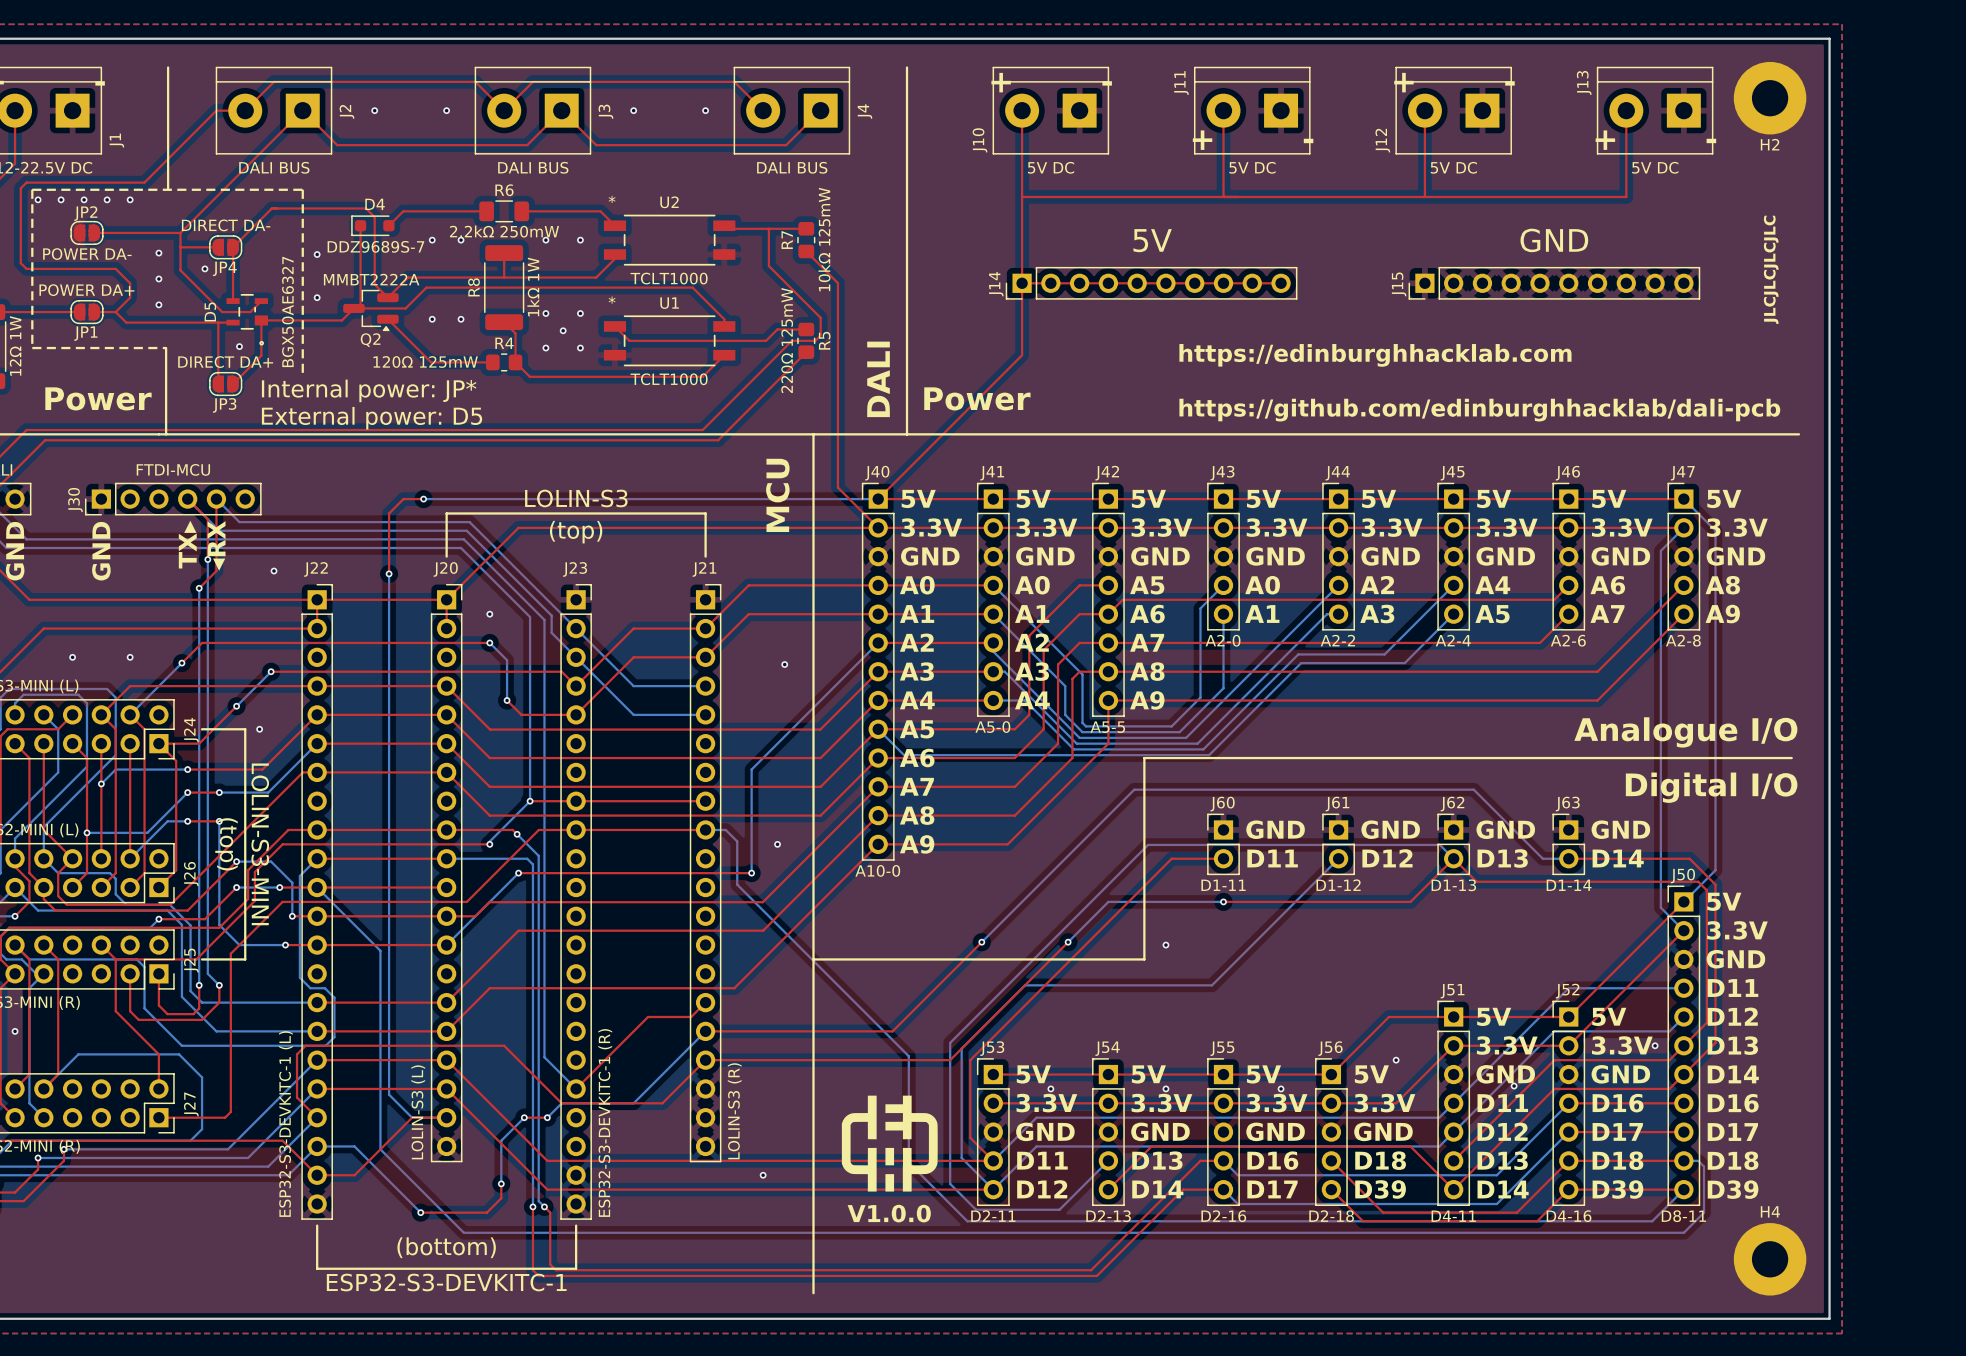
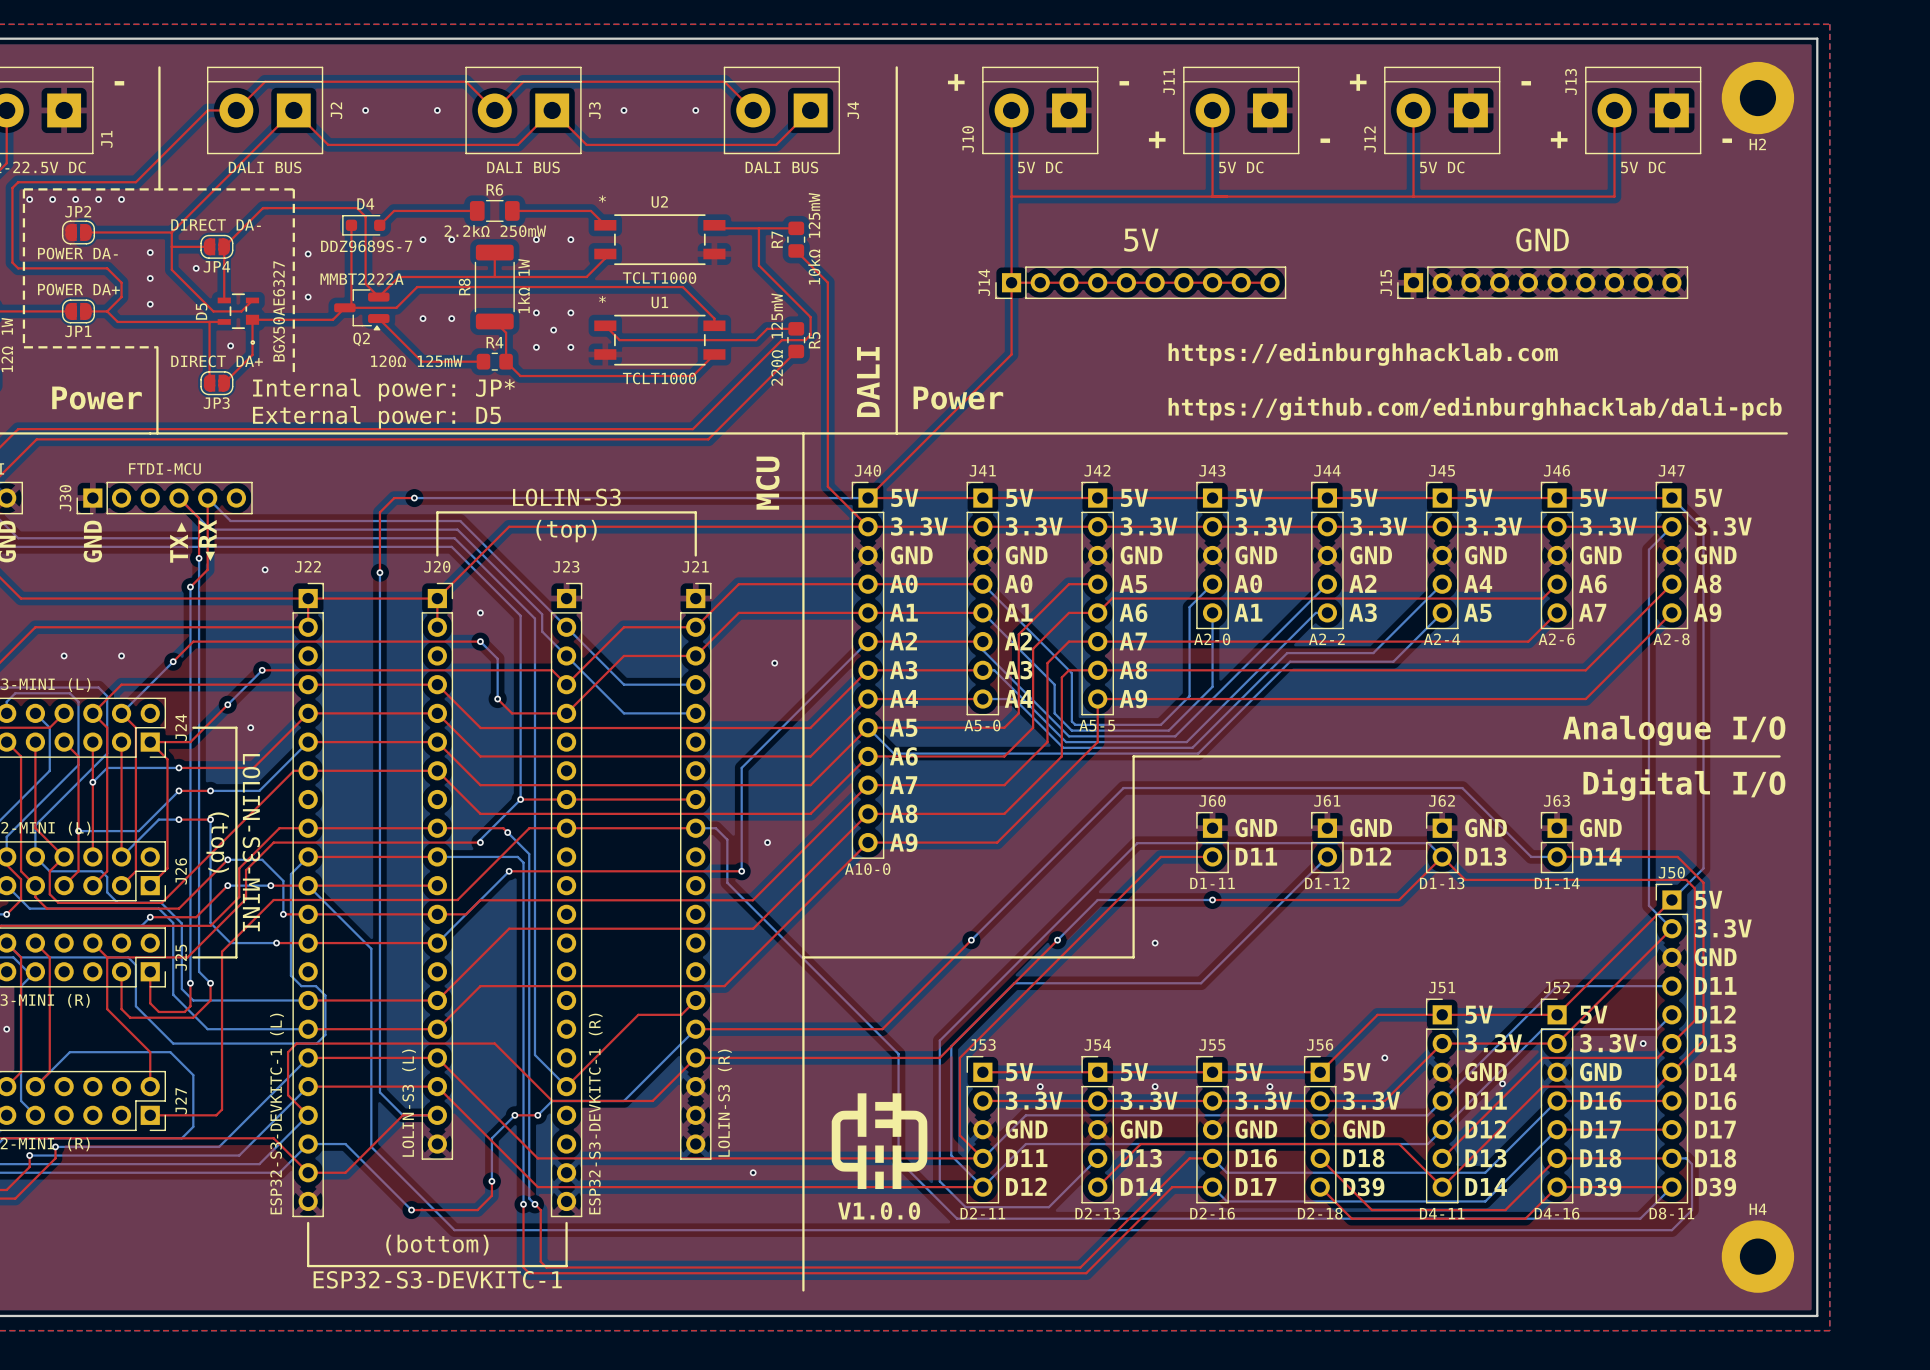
text: JLCJLCJLCJLC (1771, 269) -> none

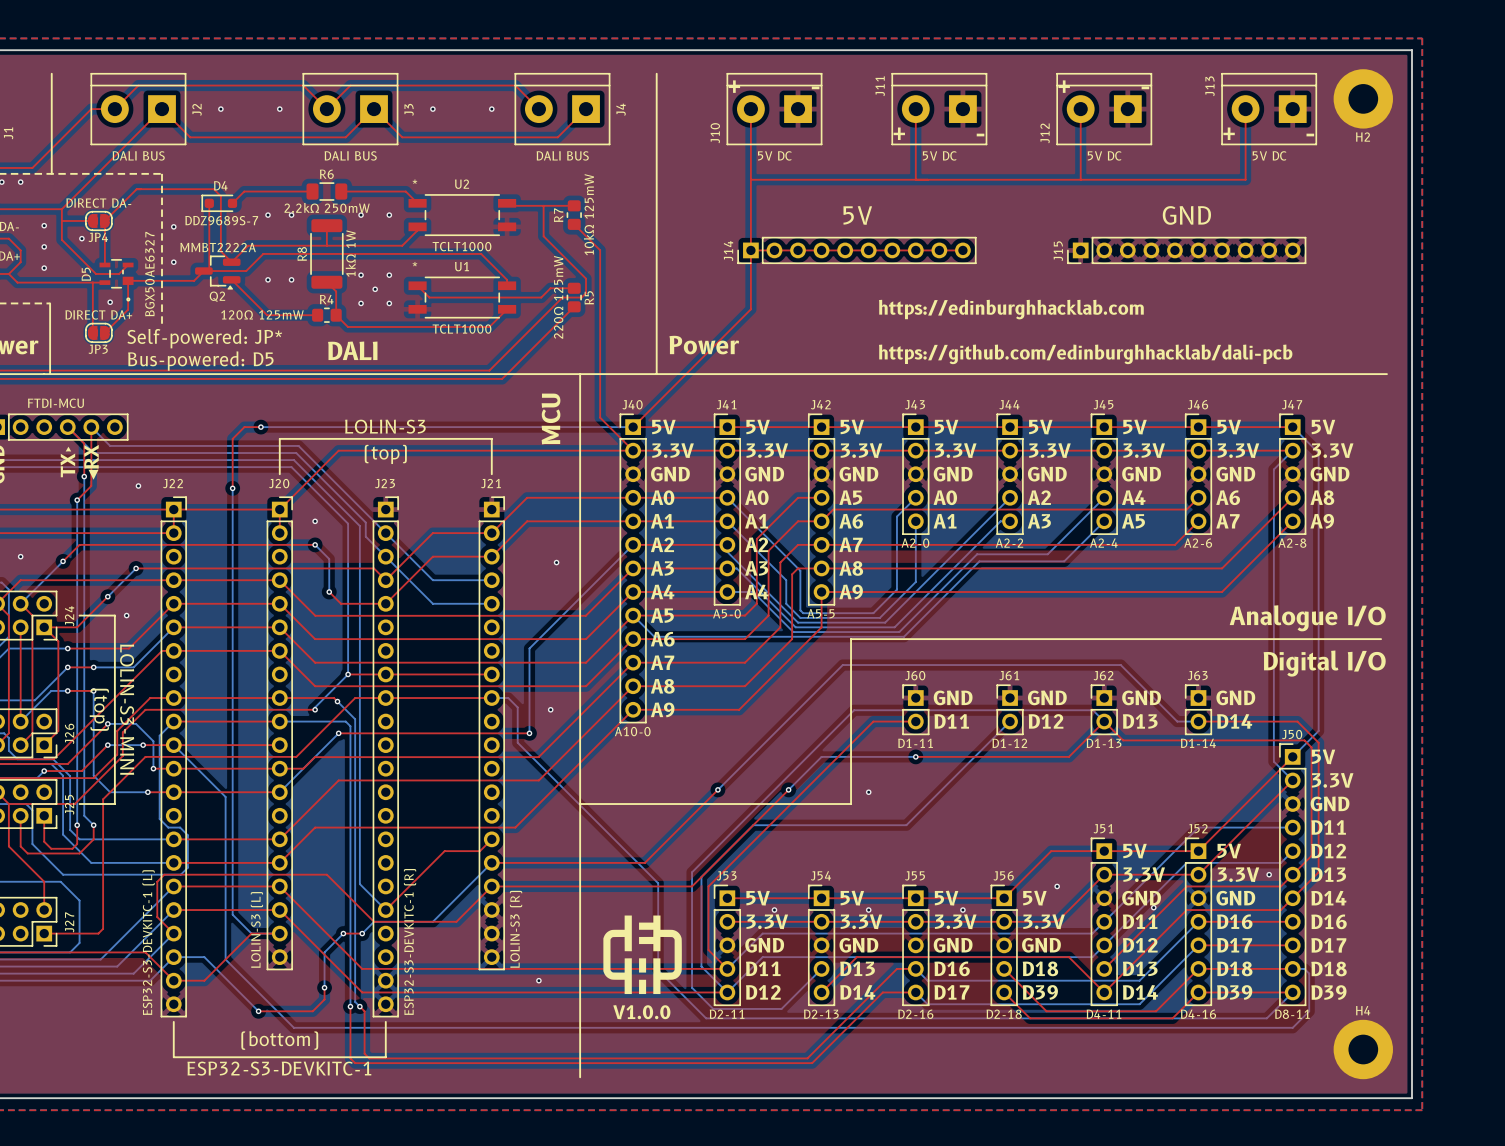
text: DALI (868, 382) -> none
text: Internal power: JP* (383, 390) -> Self-powered: JP* (204, 338)
text: none -> DALI (352, 350)
text: External power: D5 (376, 417) -> Bus-powered: D5 (200, 361)

